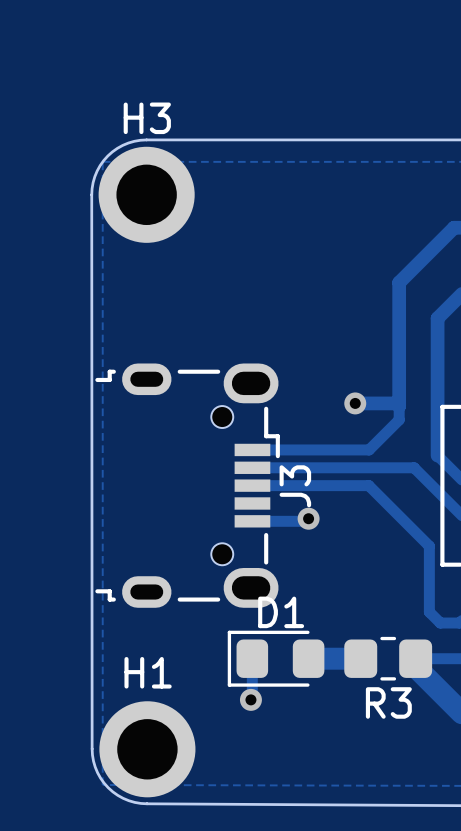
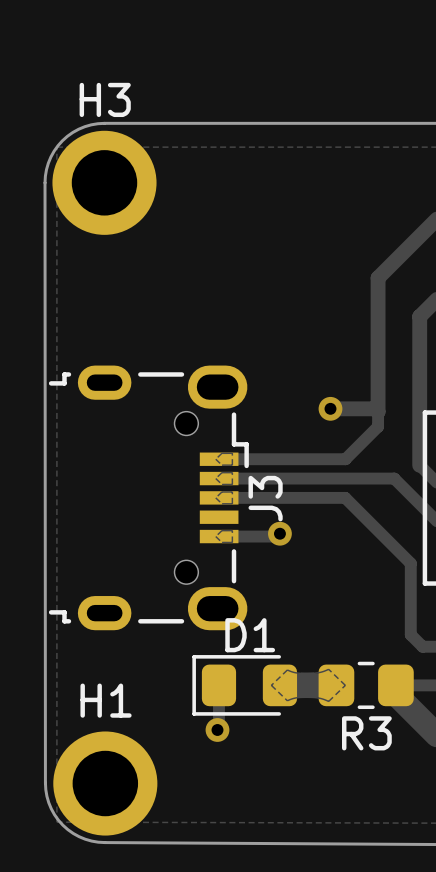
zone outline: none -> (222, 453) (215, 459) (222, 465)
zone outline: none -> (222, 453) (232, 453) (232, 465) (222, 465)
zone outline: none -> (222, 472) (215, 478) (222, 484)
zone outline: none -> (222, 472) (232, 472) (232, 484) (222, 484)
zone outline: none -> (222, 491) (215, 497) (222, 503)
zone outline: none -> (222, 491) (232, 491) (232, 503) (222, 503)
zone outline: none -> (222, 530) (215, 536) (222, 542)
zone outline: none -> (222, 530) (232, 530) (232, 542) (222, 542)
zone outline: none -> (301, 673) (316, 673) (328, 669) (345, 685) (328, 701) (316, 697) (301, 697)
zone outline: none -> (301, 673) (287, 669) (271, 685) (287, 700) (301, 697)

